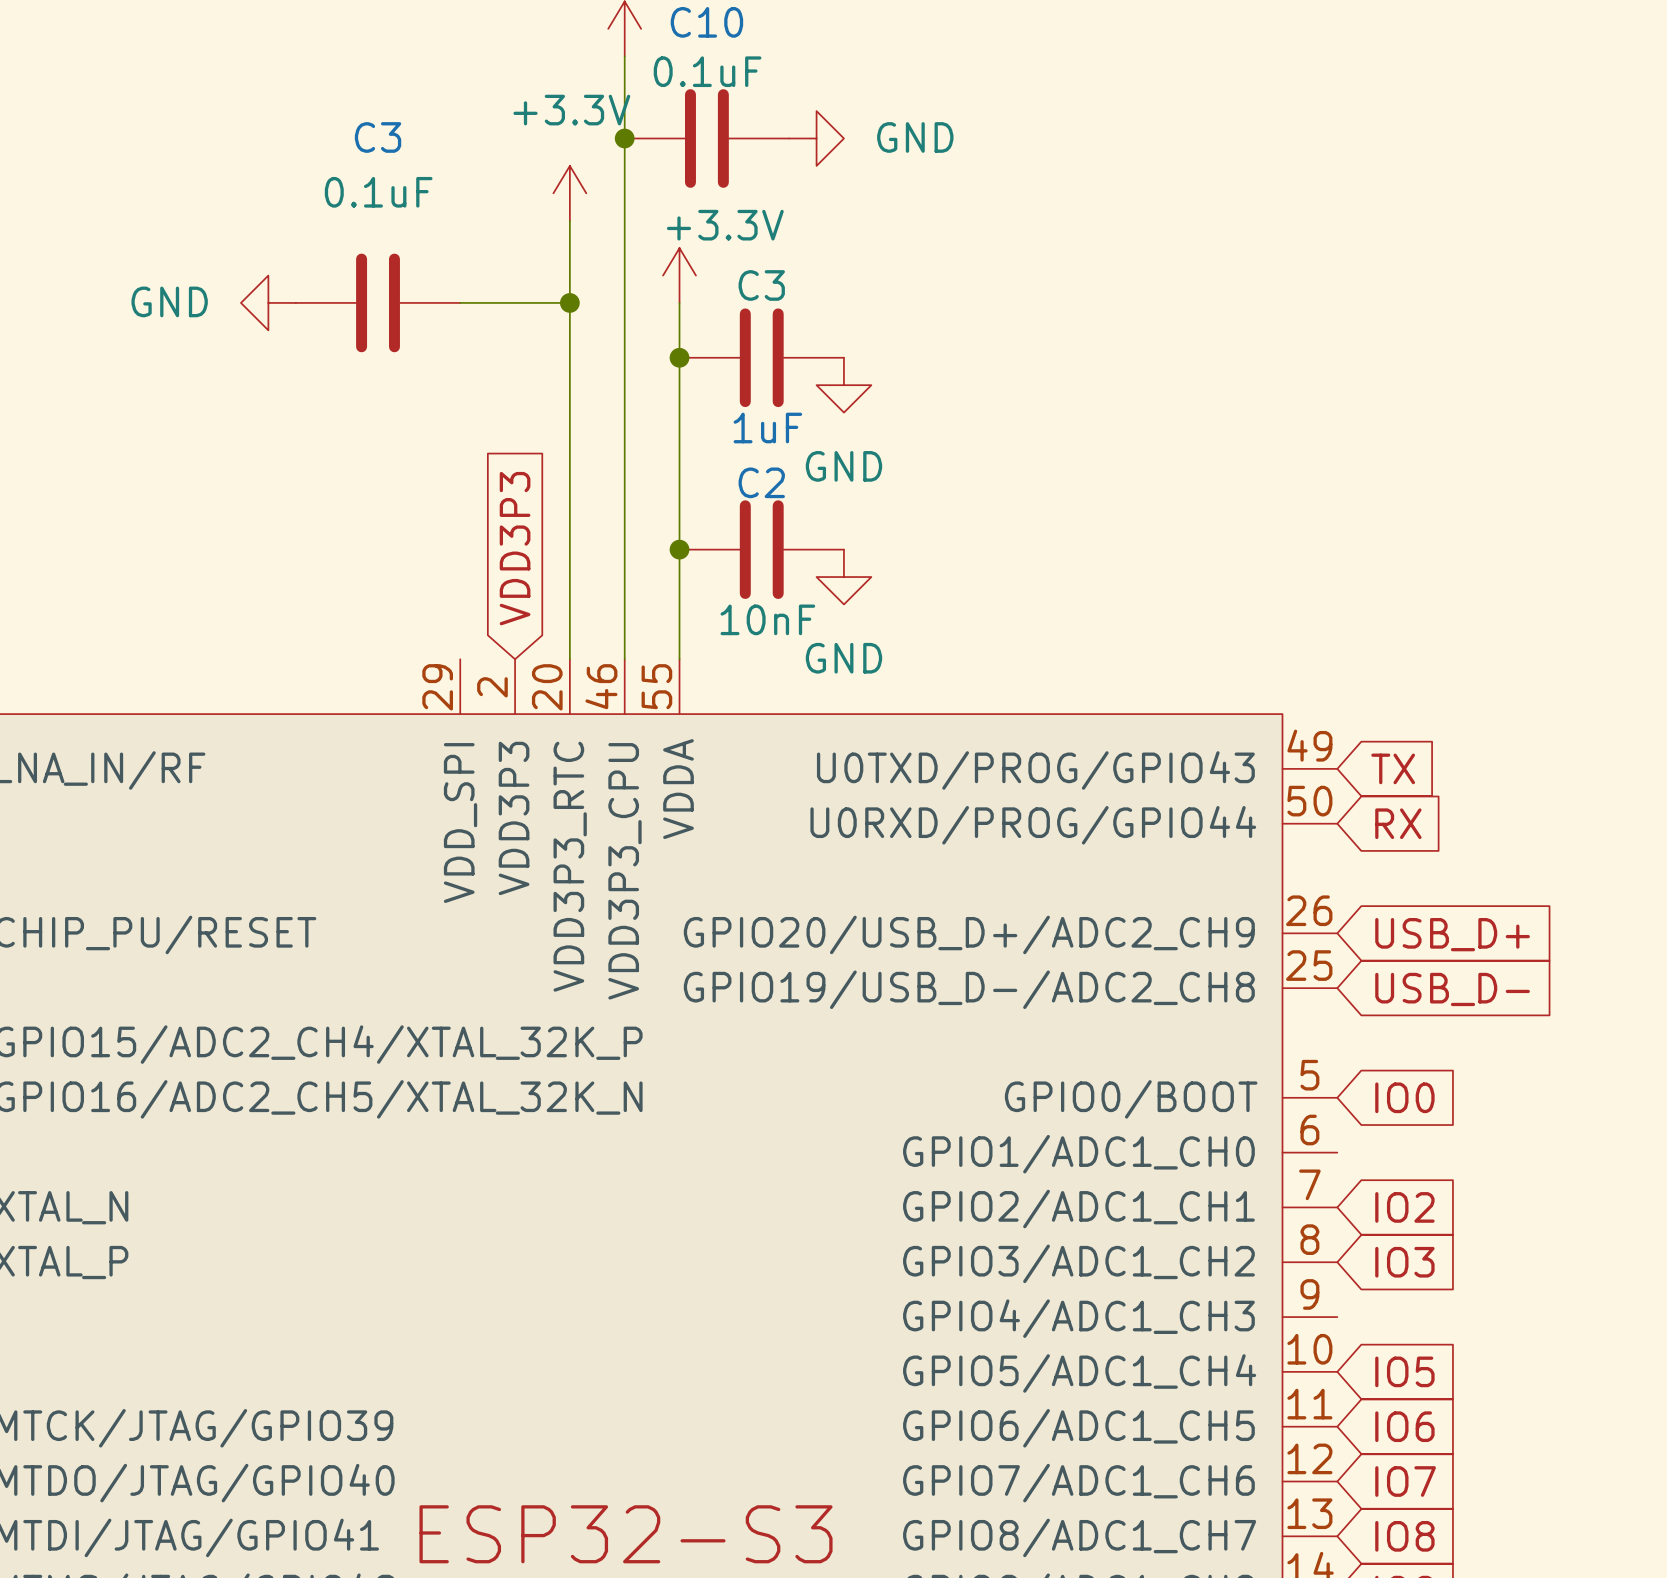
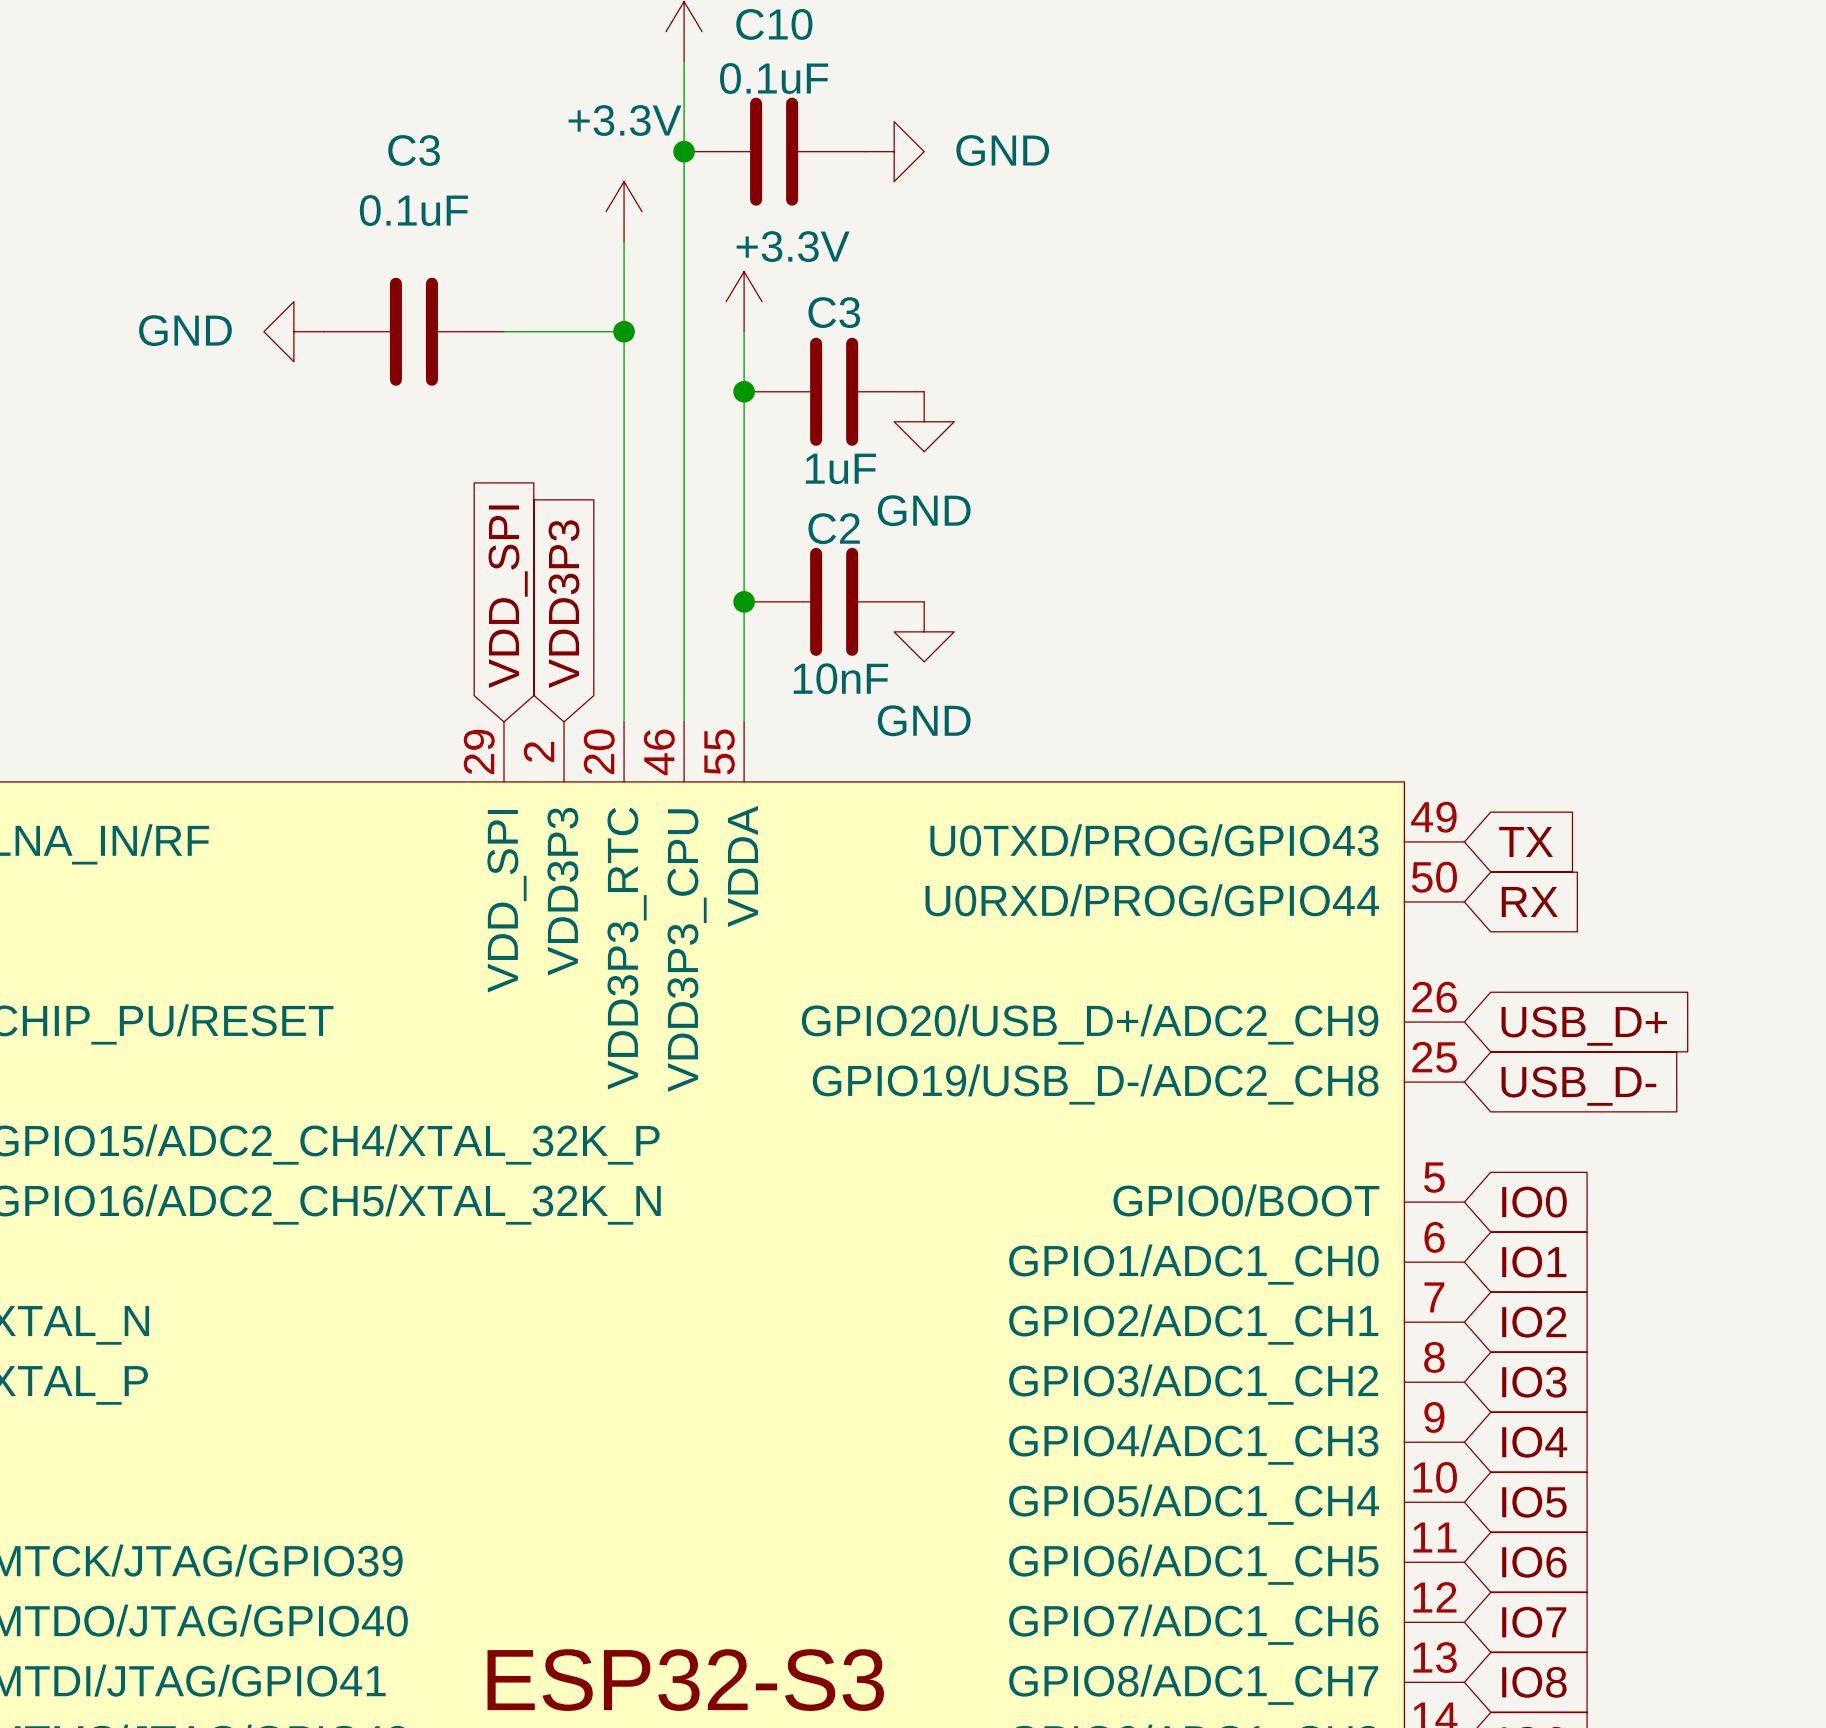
global label: none -> VDD_SPI (508, 596)
global label: none -> IO1 (1534, 1262)
global label: none -> IO4 (1534, 1442)

